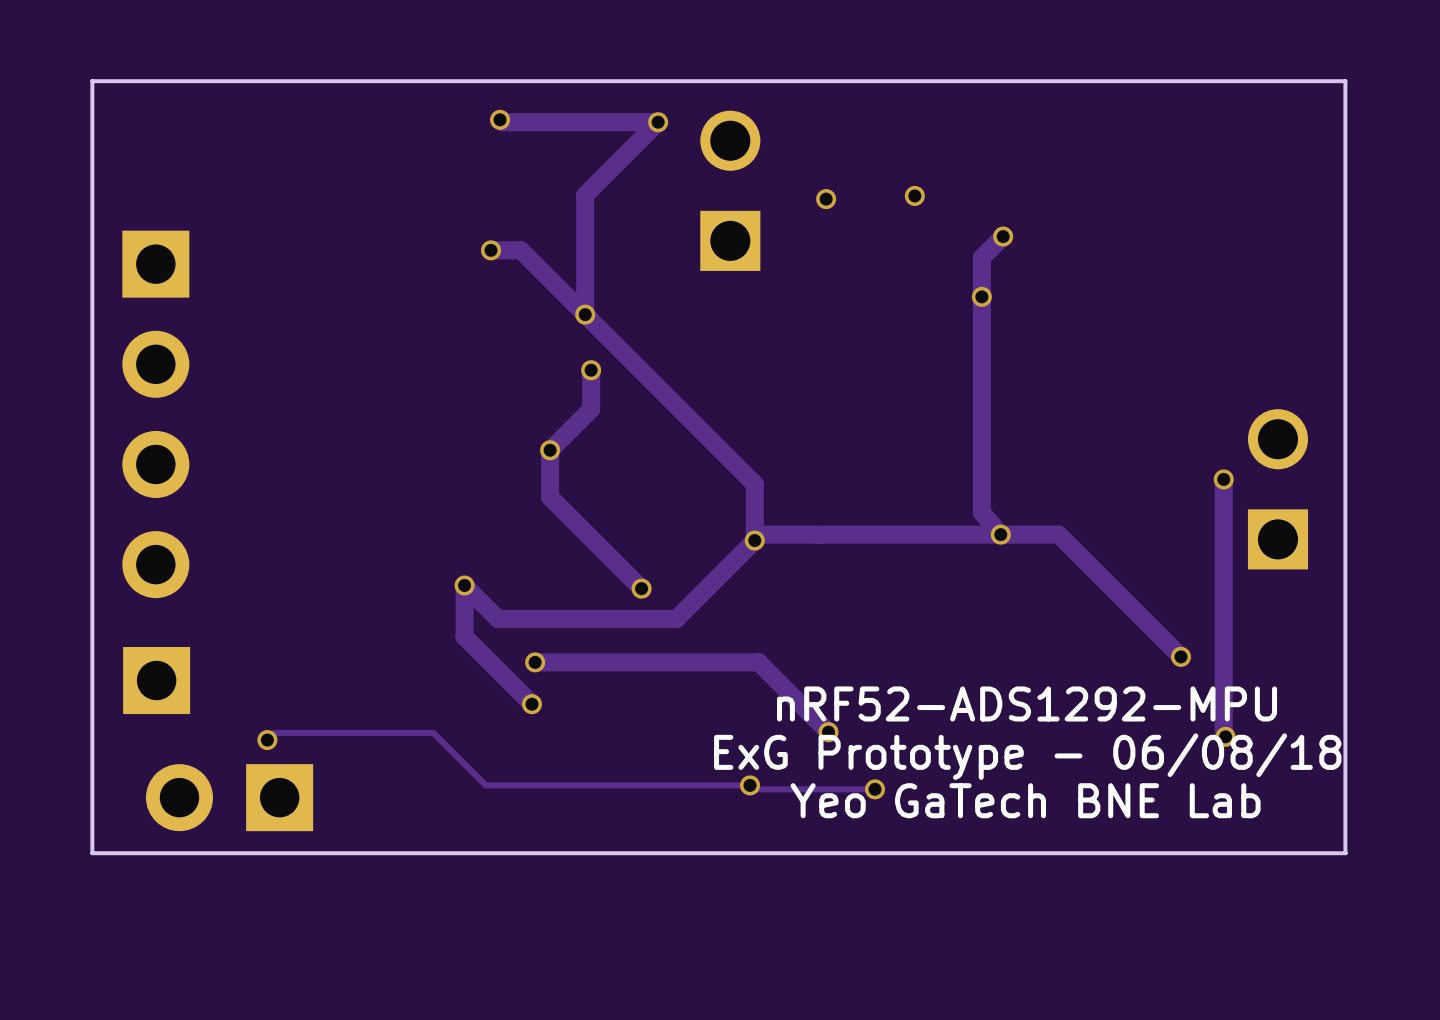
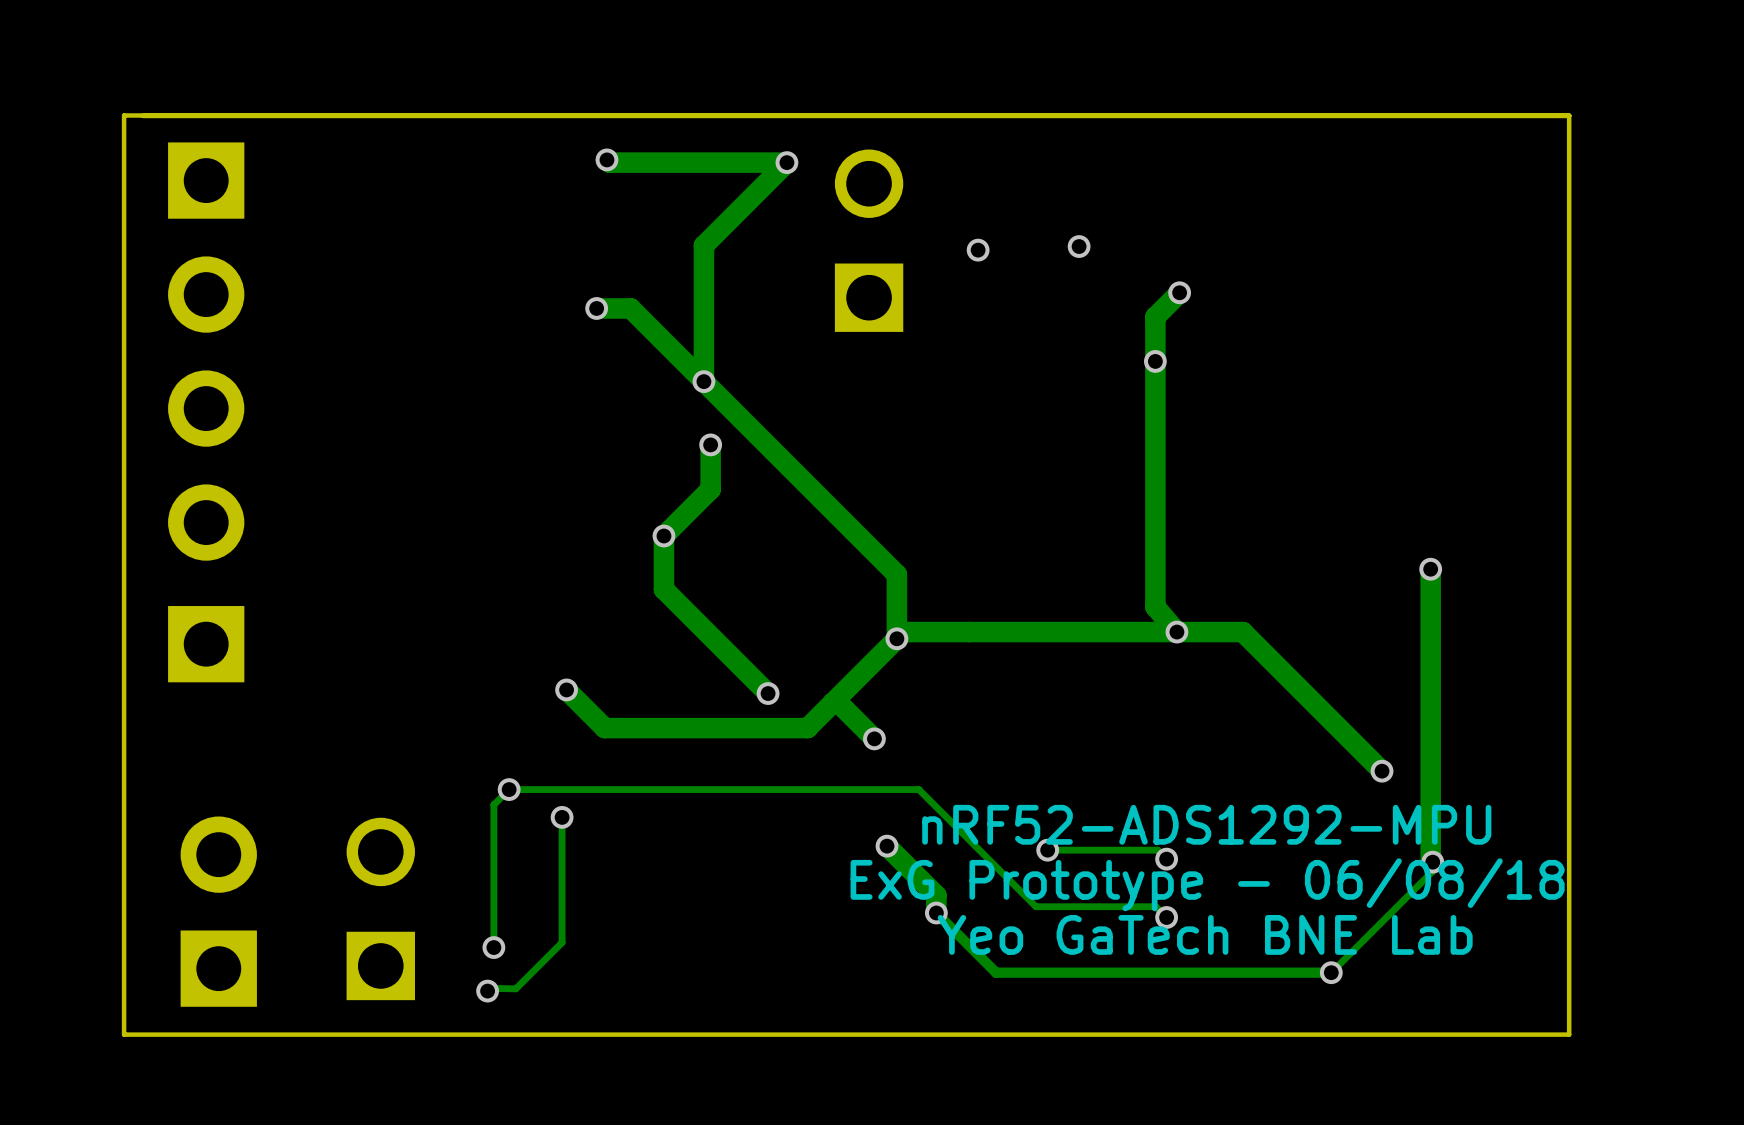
board edge: (92, 80) (92, 853) (1345, 853) -> (1569, 115) (124, 115) (124, 1034) (1569, 1034) (1569, 994)
part position: (155, 414) -> (206, 351)
part: (1277, 489) -> none
track: (464, 585) (464, 636) (531, 704) -> none
track: none -> (832, 702) (838, 702) (874, 738)
via: none -> (874, 738)
track: (535, 662) (758, 662) (828, 732) -> none
via: (535, 662) -> none
via: none -> (509, 789)
part position: (156, 680) -> (206, 644)
track: none -> (562, 817) (562, 942) (515, 988) (490, 988) (487, 991)
via: none -> (562, 817)
via: (531, 704) -> none
track: none -> (887, 846) (936, 895) (936, 912) (996, 972) (1331, 972) (1432, 871) (1432, 862)
via: none -> (887, 846)
track: none -> (1047, 850) (1157, 850) (1166, 859)
via: none -> (1047, 850)
via: (828, 732) -> none
via: none -> (1166, 859)
track: (267, 740) (274, 732) (433, 732) (485, 785) (750, 785) (753, 789) (875, 789) -> none
via: (267, 740) -> none
part: none -> (380, 908)
via: none -> (936, 912)
via: (750, 785) -> none
track: none -> (1166, 917) (1155, 906) (1036, 906) (918, 789) (509, 789) (493, 804) (493, 947)
via: none -> (1166, 917)
via: (875, 789) -> none
part rotation: 0° (229, 797) -> 90° clockwise (218, 911)
via: none -> (493, 947)
via: none -> (1331, 972)
via: none -> (487, 991)

